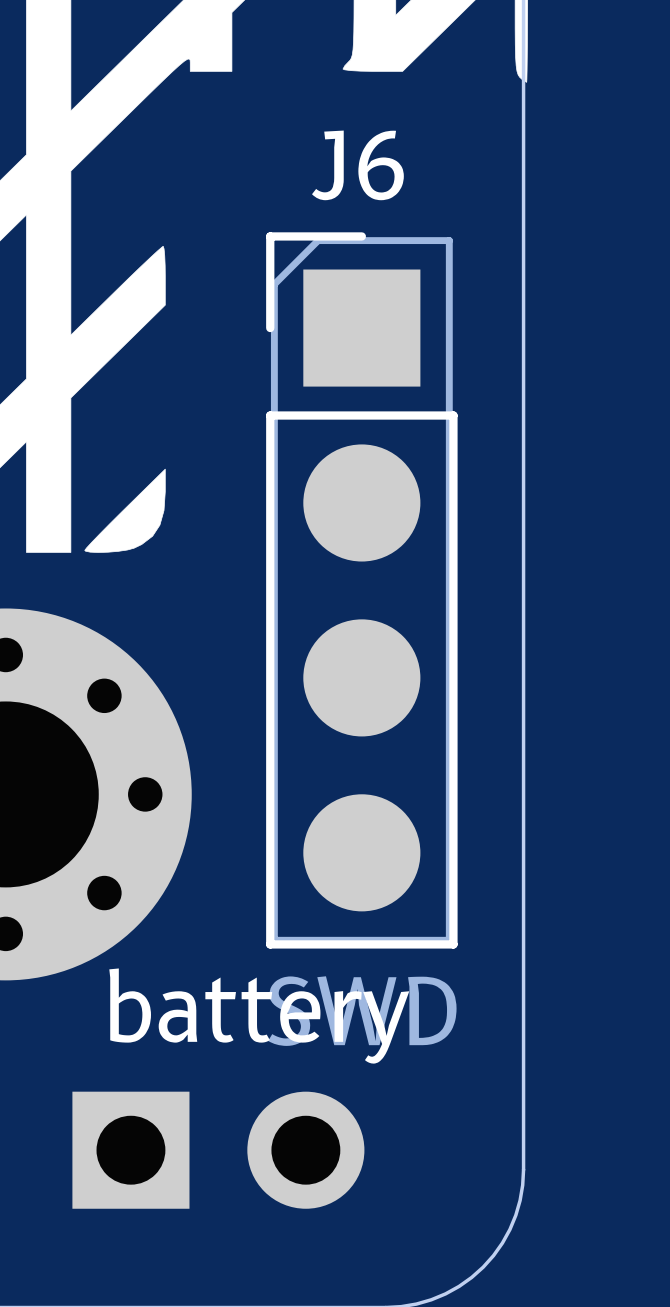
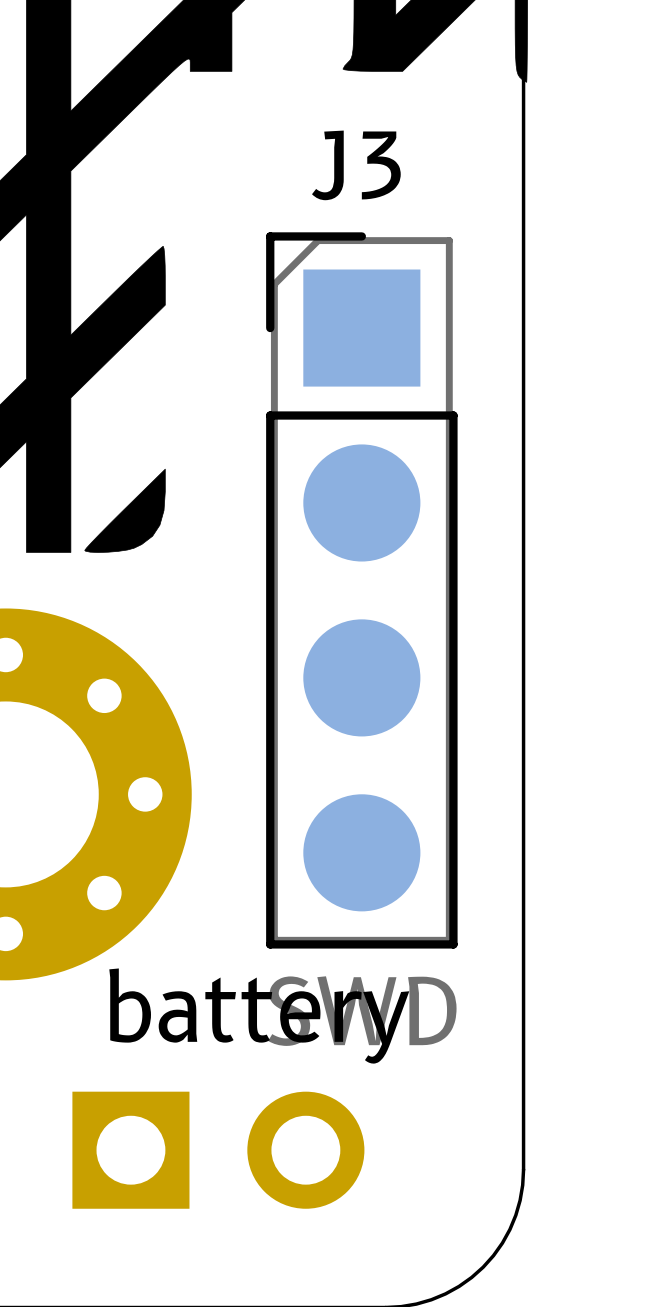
J6 name: J6 (357, 165) -> J3 (356, 165)

